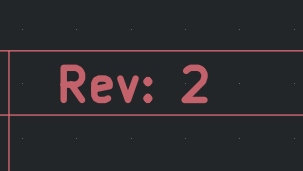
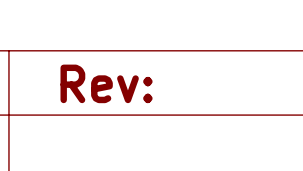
title block: Rev: 2 (134, 83) -> Rev: (106, 83)

